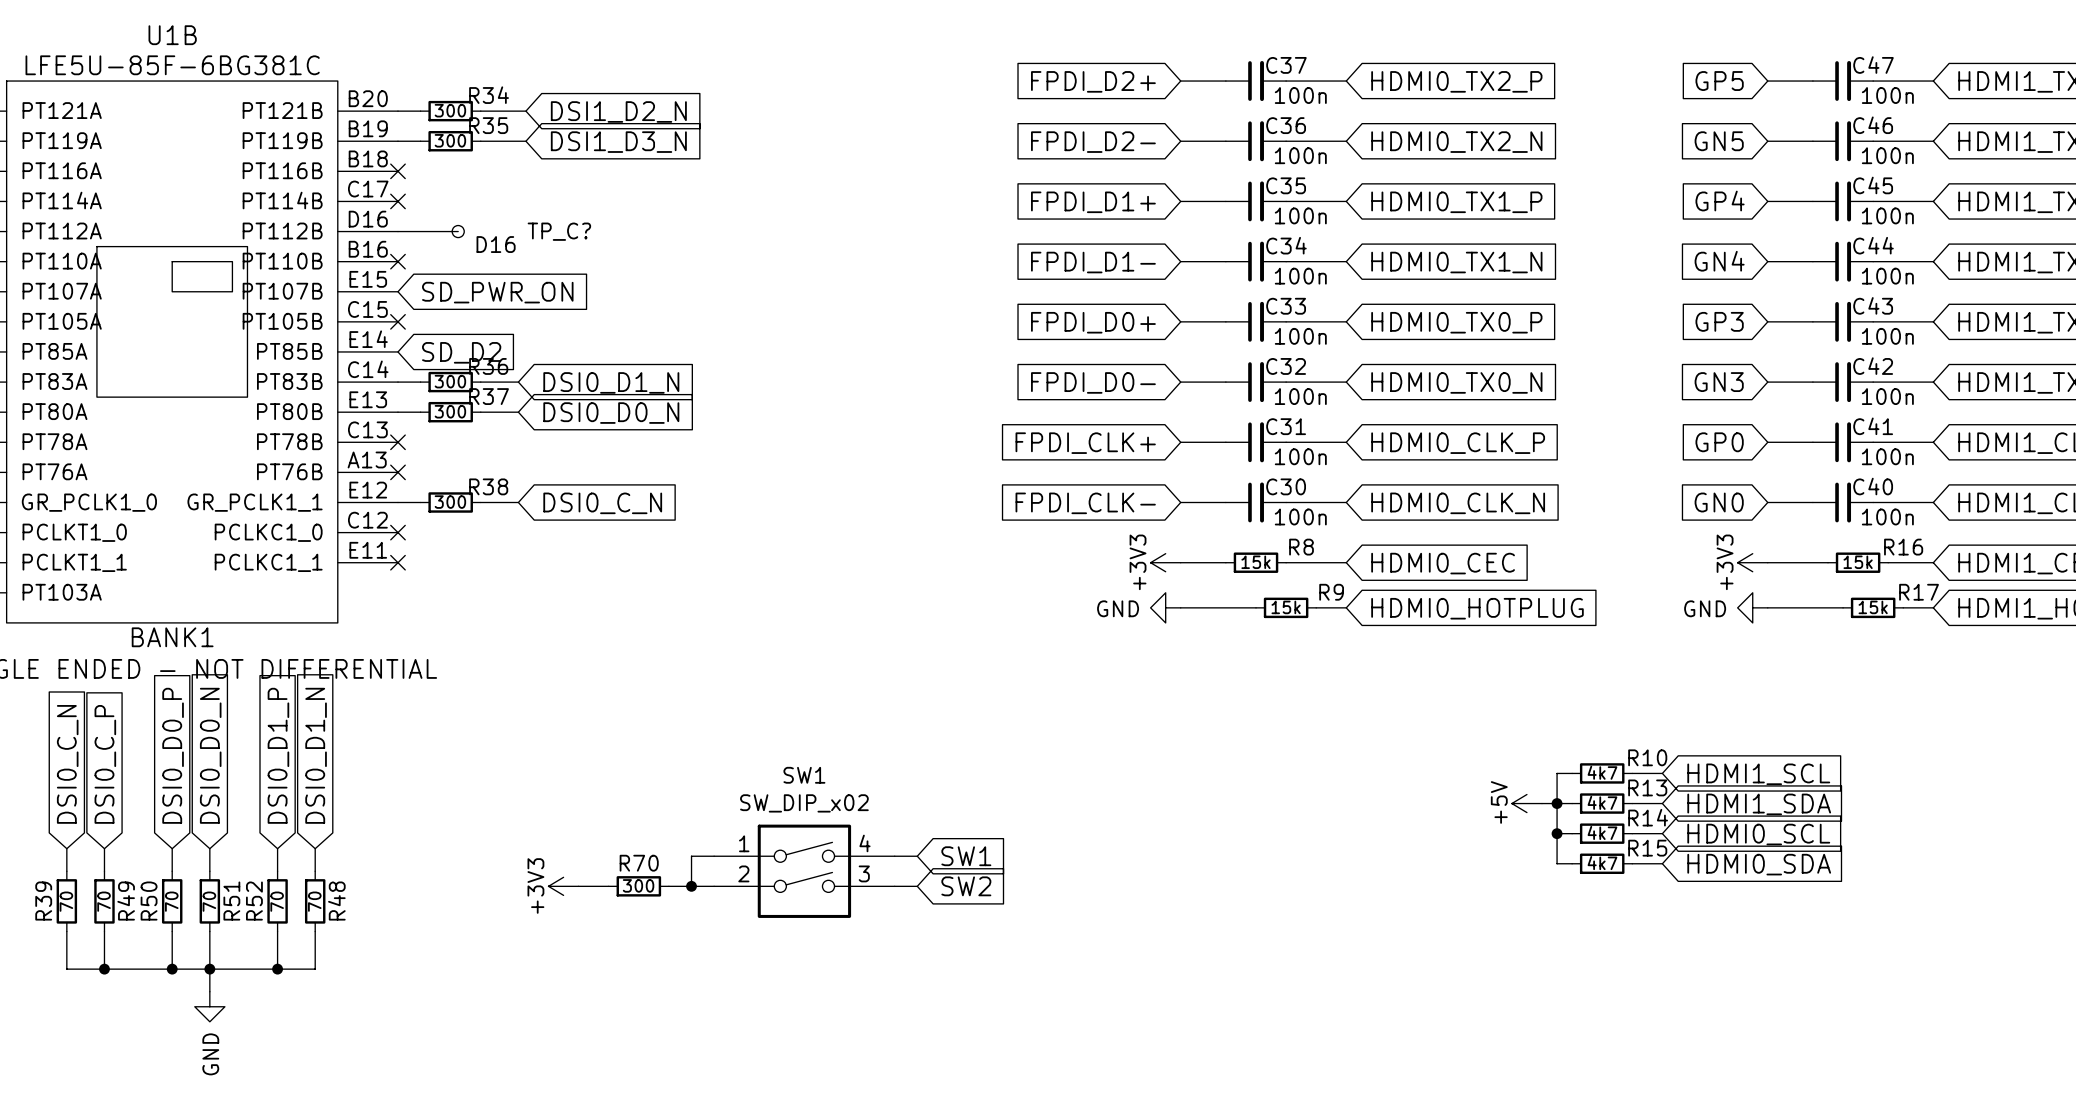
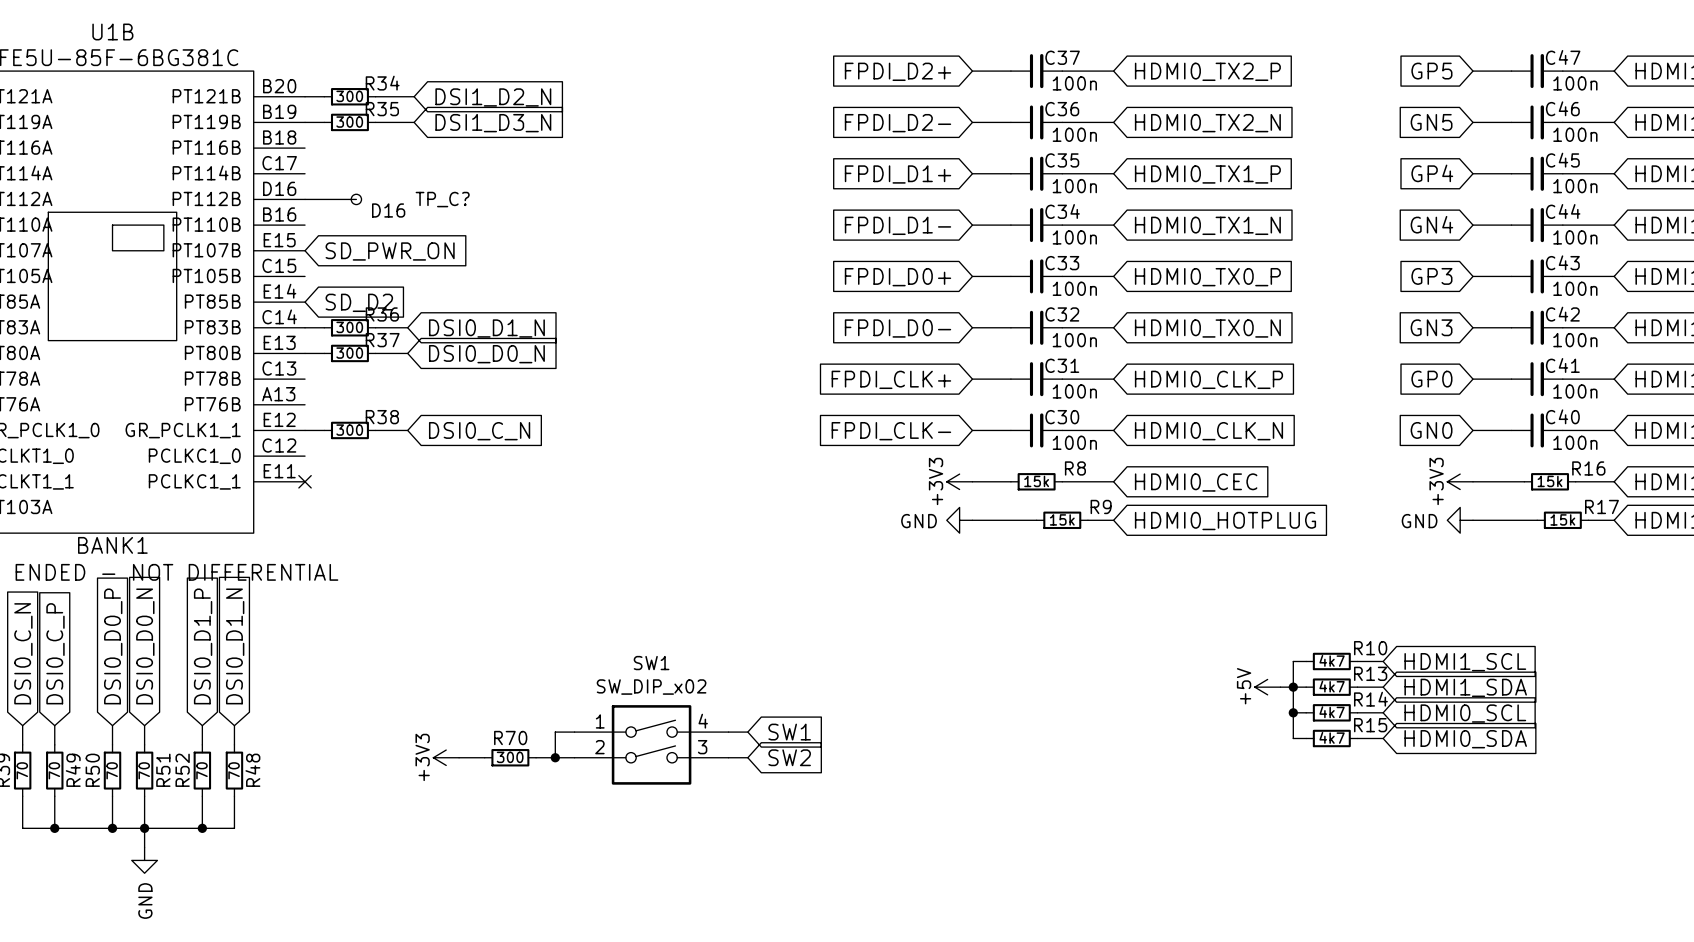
no-connect mark: (398, 171) -> none
no-connect mark: (398, 201) -> none
no-connect mark: (398, 261) -> none
no-connect mark: (398, 321) -> none
no-connect mark: (398, 442) -> none
no-connect mark: (398, 472) -> none
no-connect mark: (398, 532) -> none

